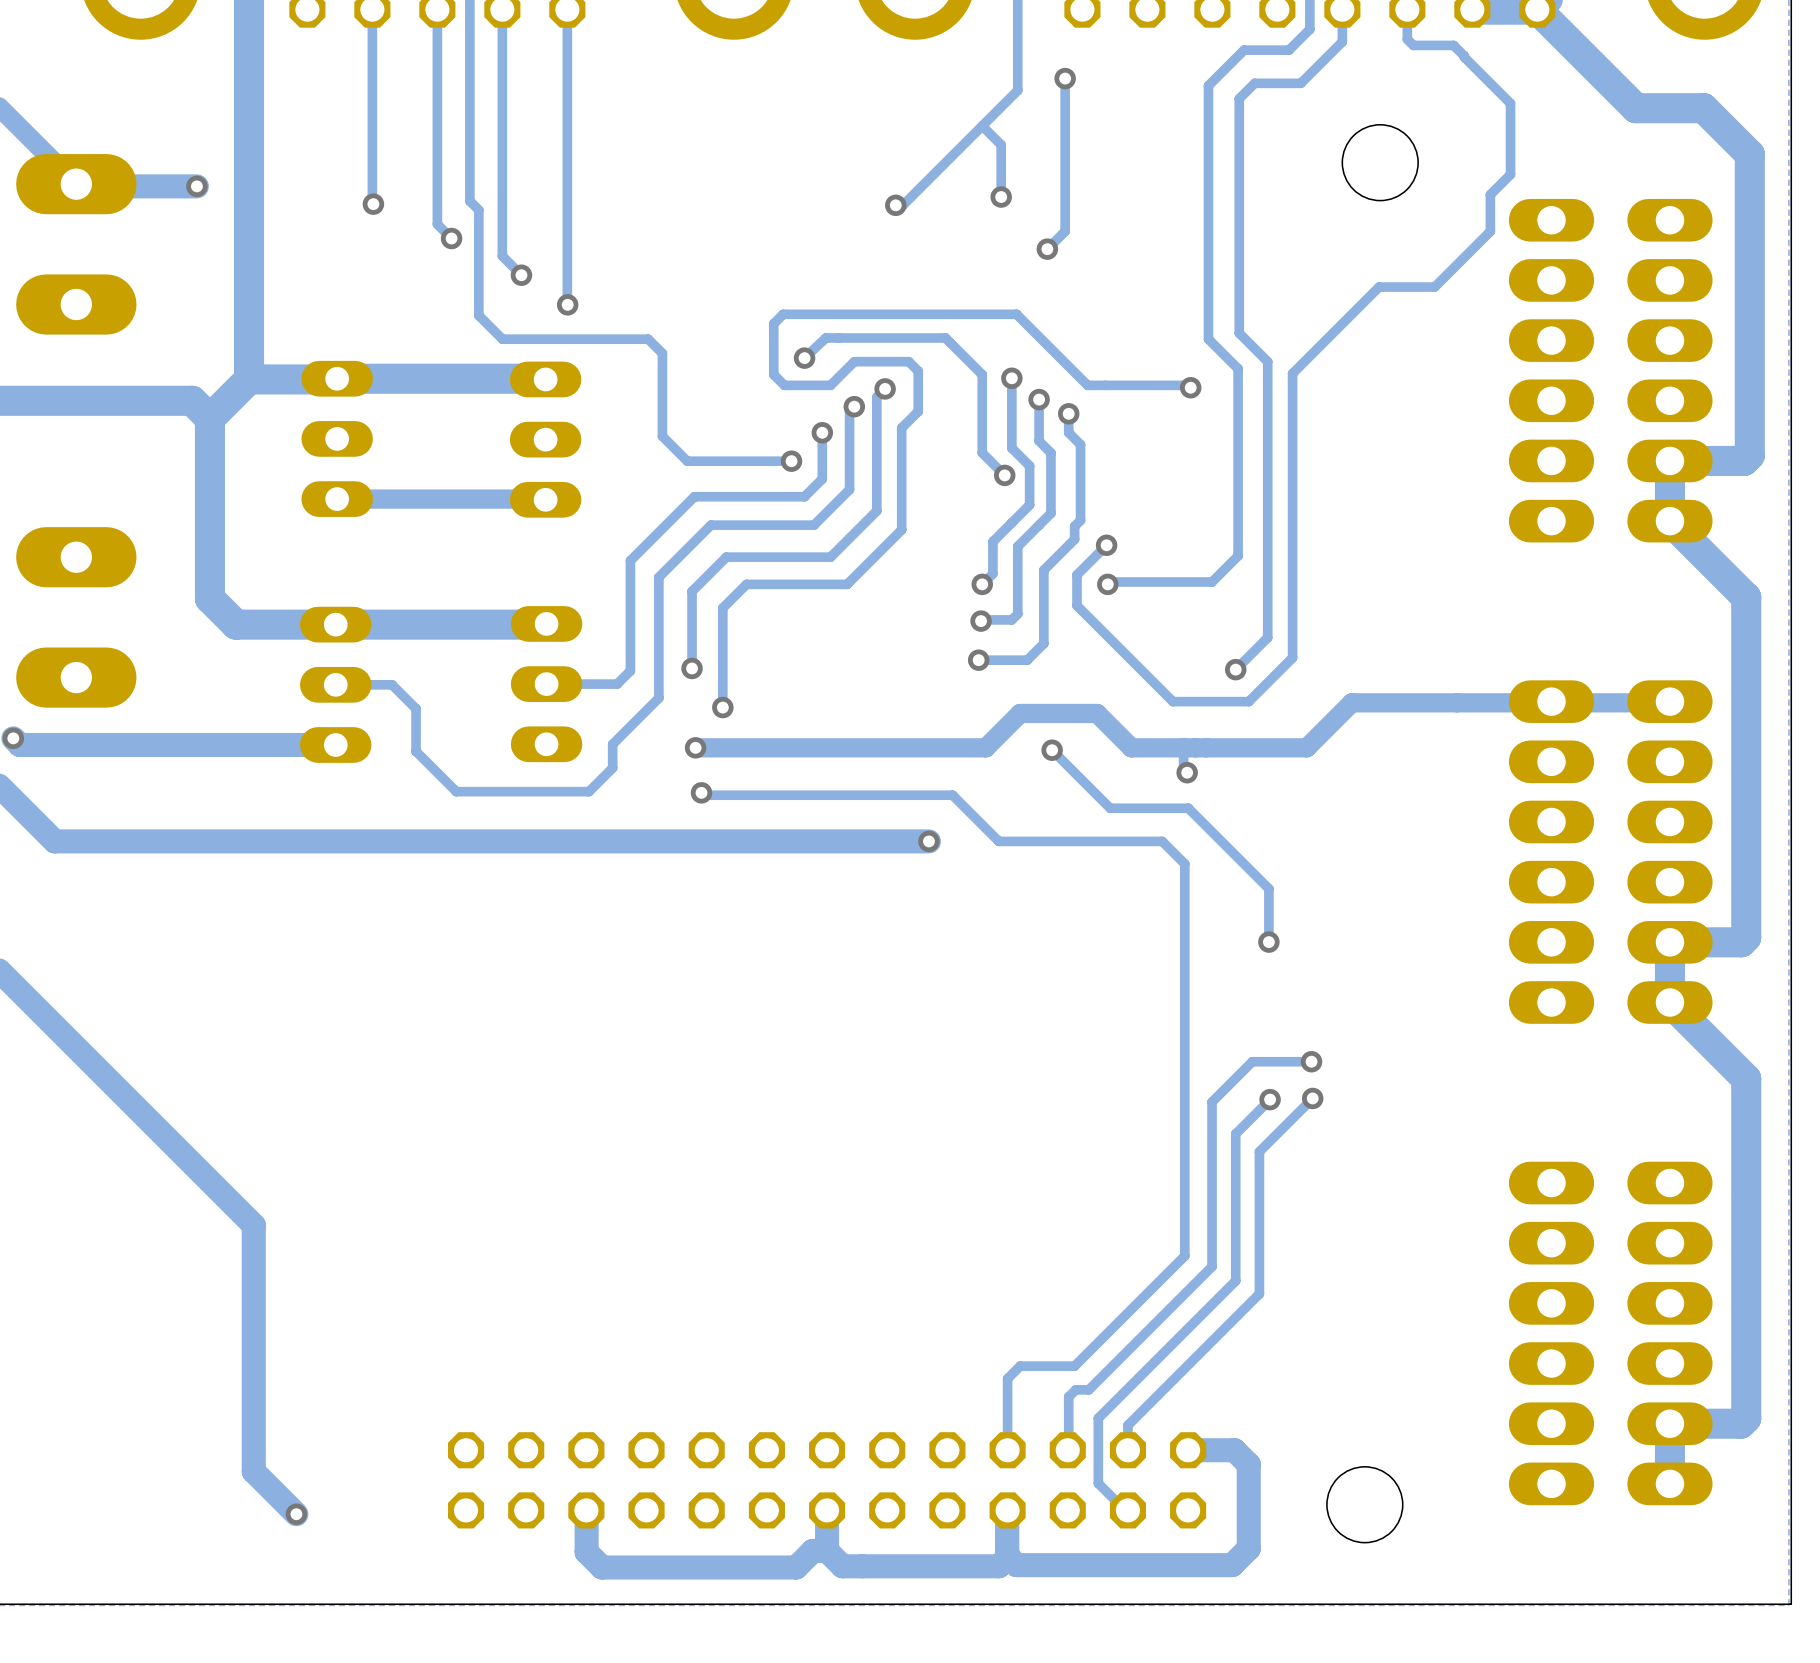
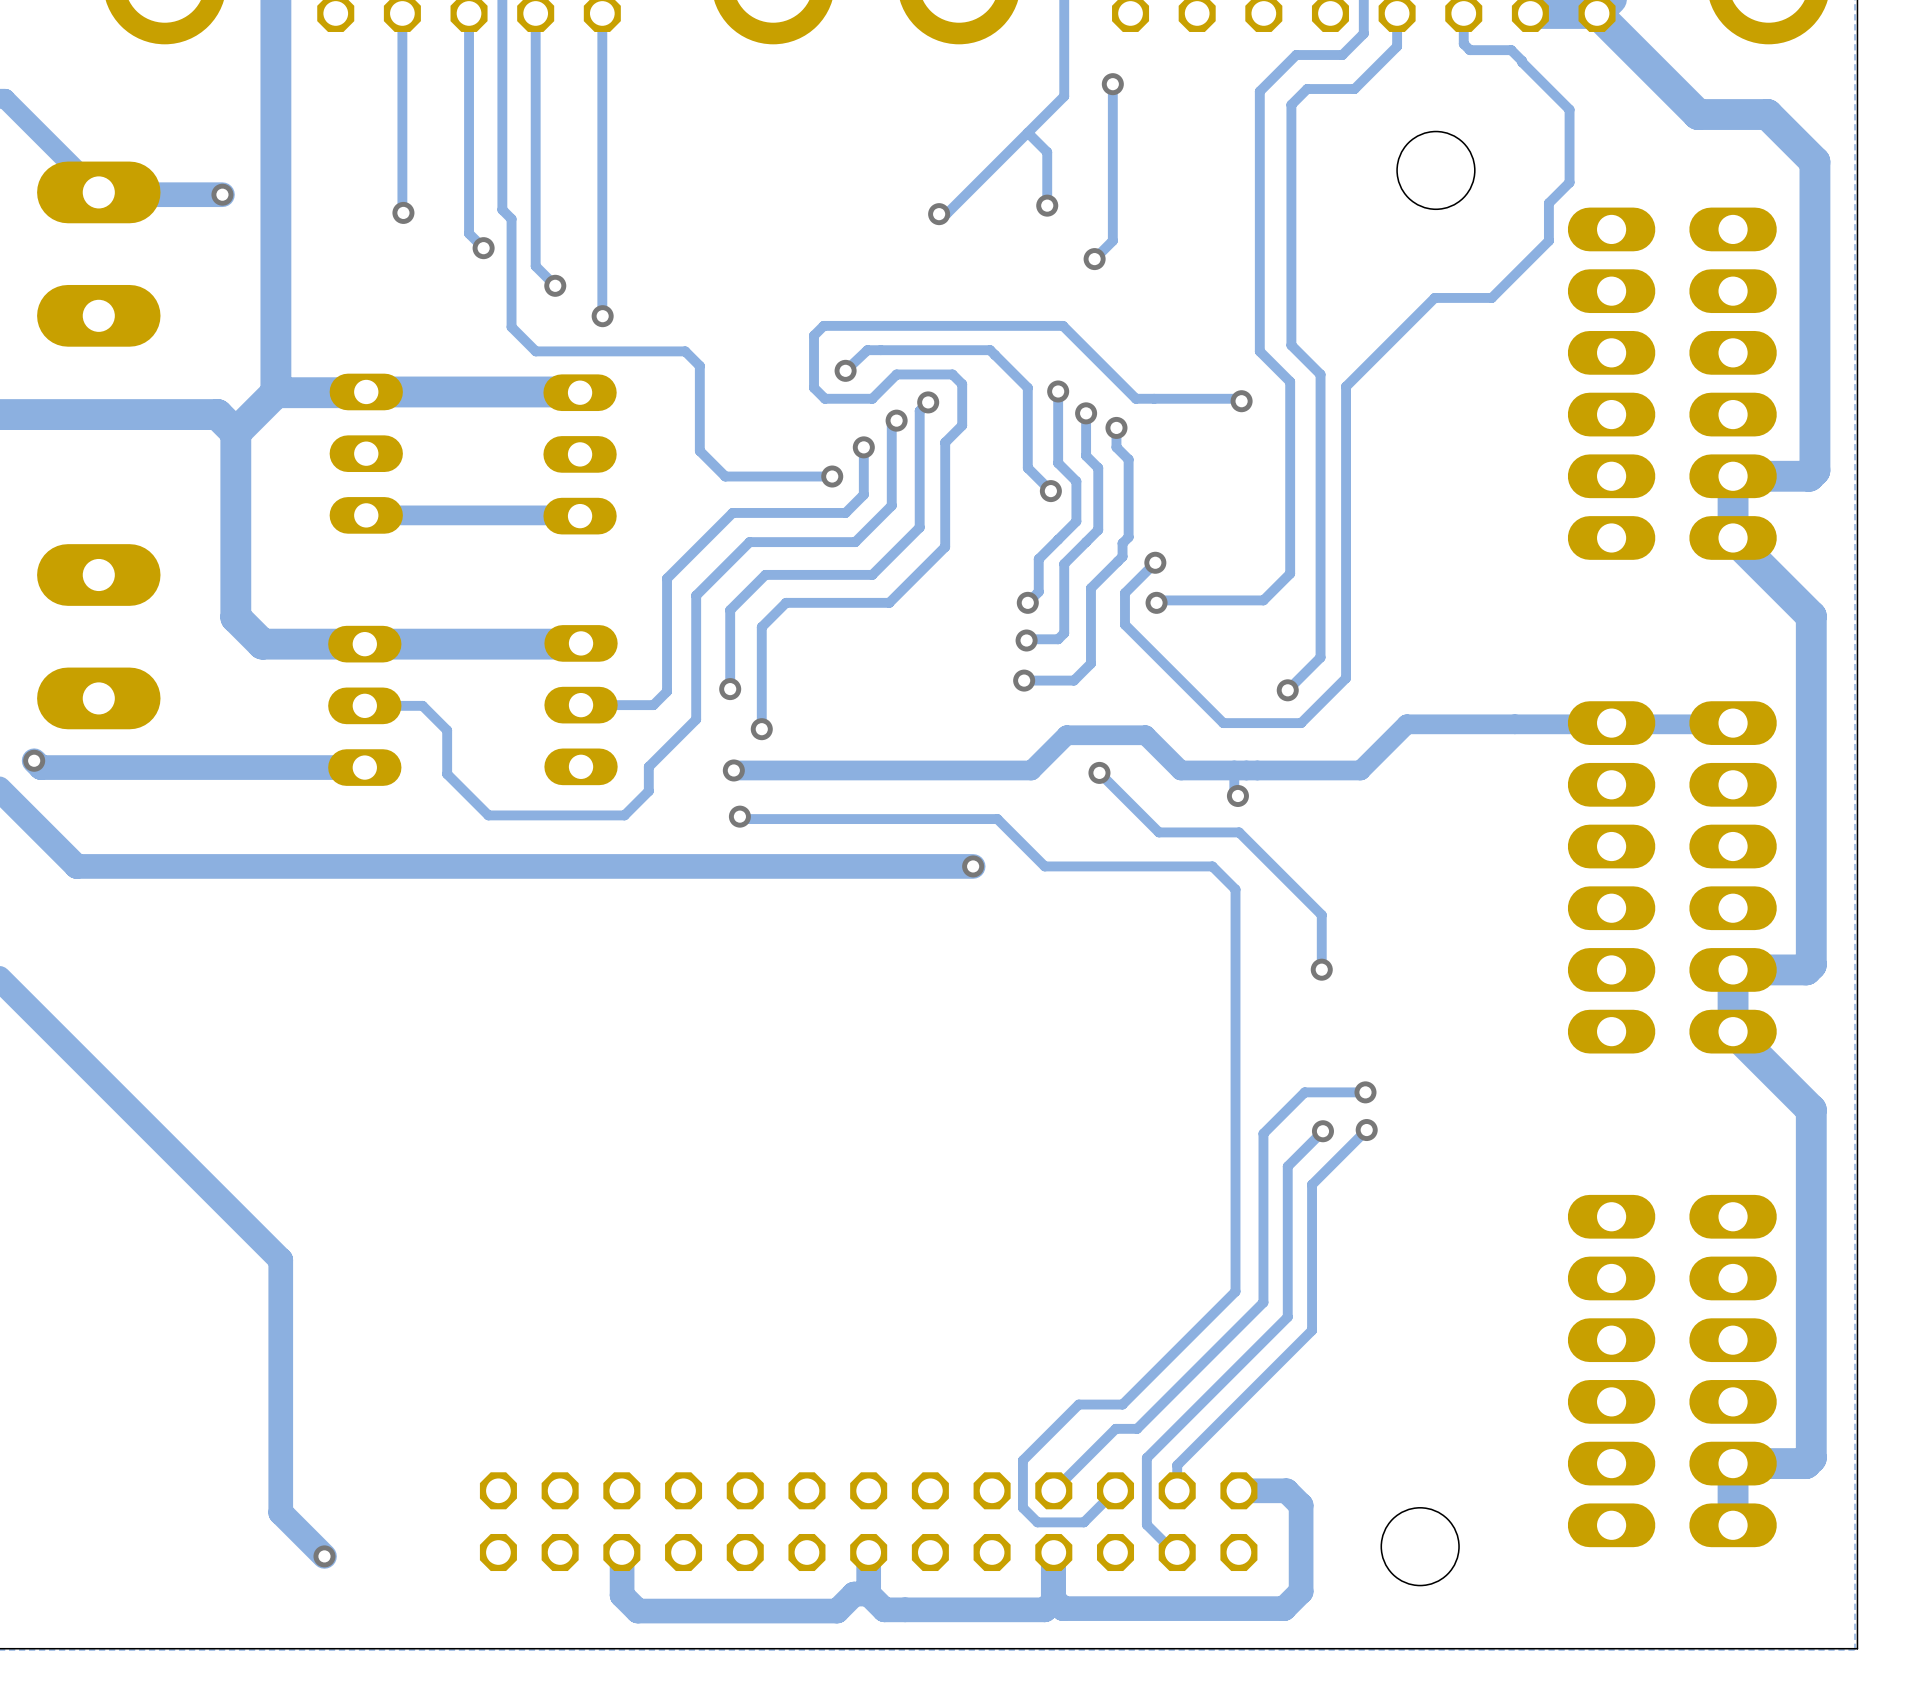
track: (1031, 1366) (1020, 1366) (1007, 1378) (1007, 1450) -> (1123, 1428) (1115, 1428) (1053, 1490)
track: (1075, 1389) (1068, 1396) (1067, 1450) -> (1078, 1404) (1022, 1460) (1022, 1507) (1037, 1522) (1083, 1522) (1115, 1490)

